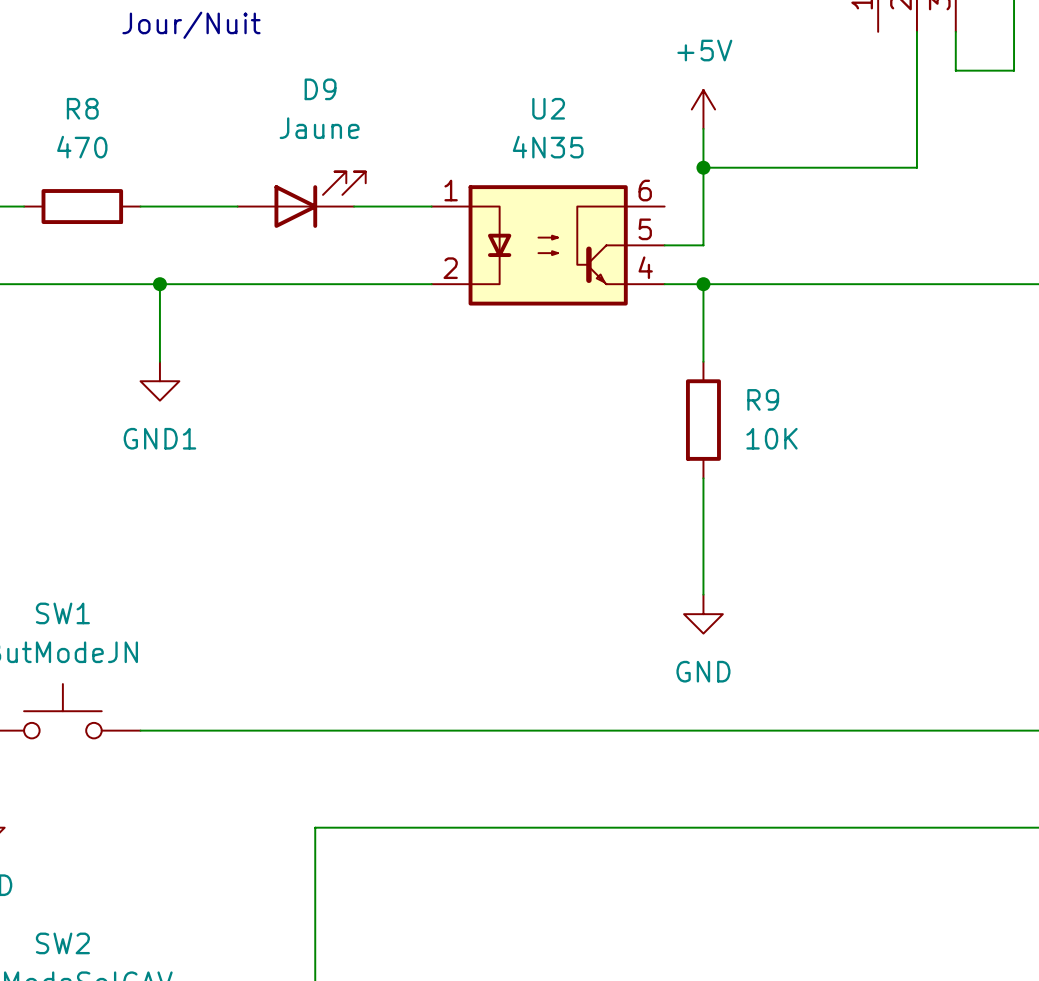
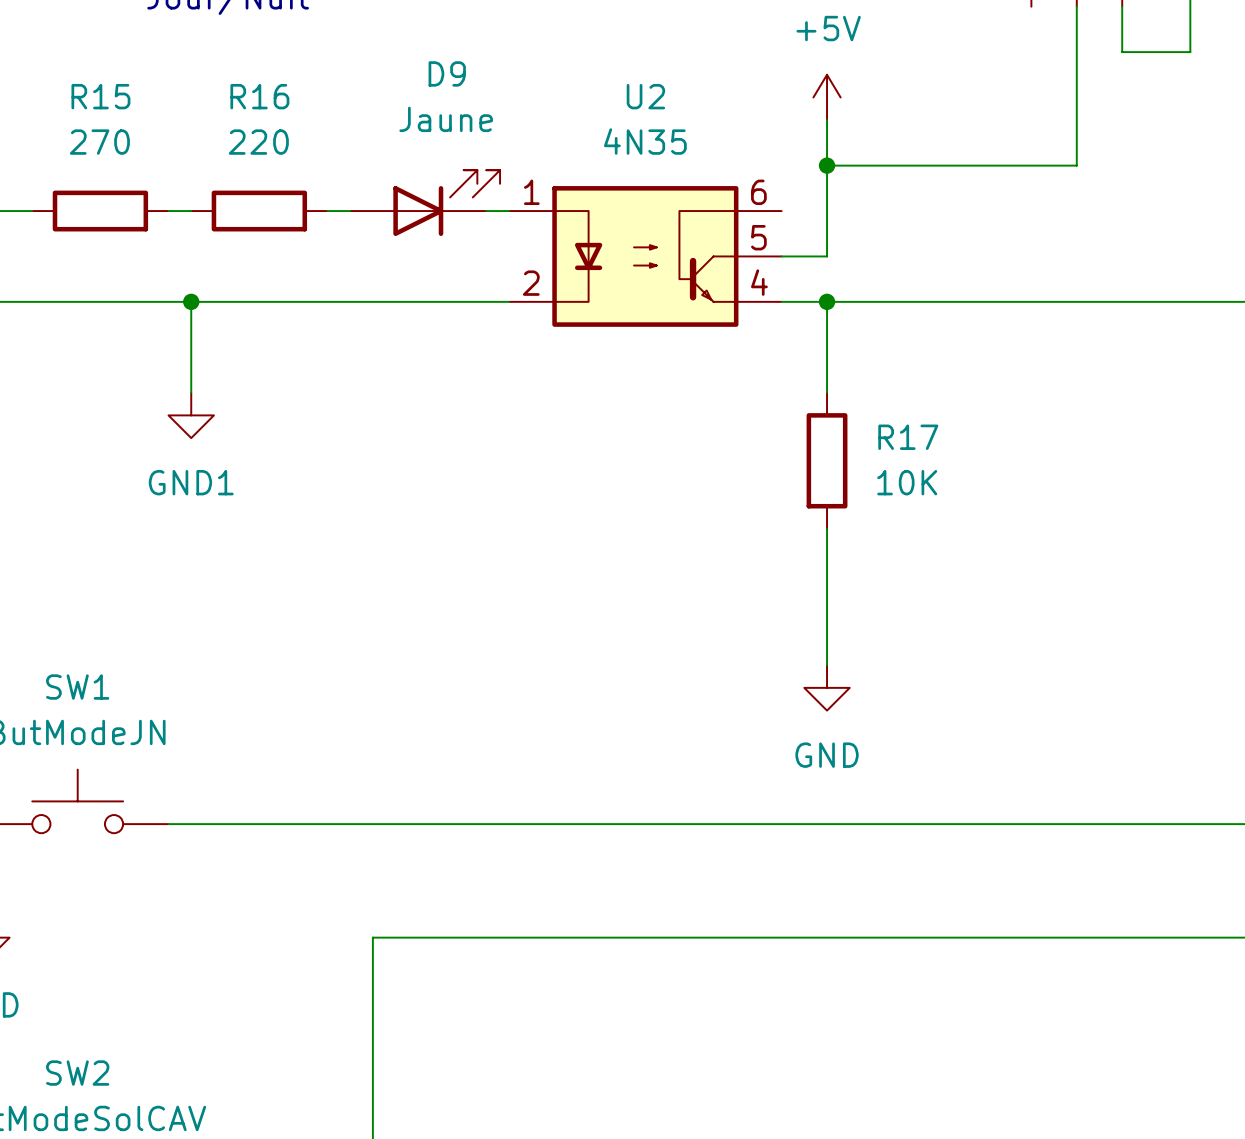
R8 name: R8 (82, 108) -> R15 (100, 96)
R8 value: 470 (82, 147) -> 270 (99, 142)
D9 position: (301, 199) -> (425, 203)
wire: (159, 206) (237, 206) -> none
R16: none -> 220 (259, 211)
R9 name: R9 (763, 399) -> R17 (908, 437)

